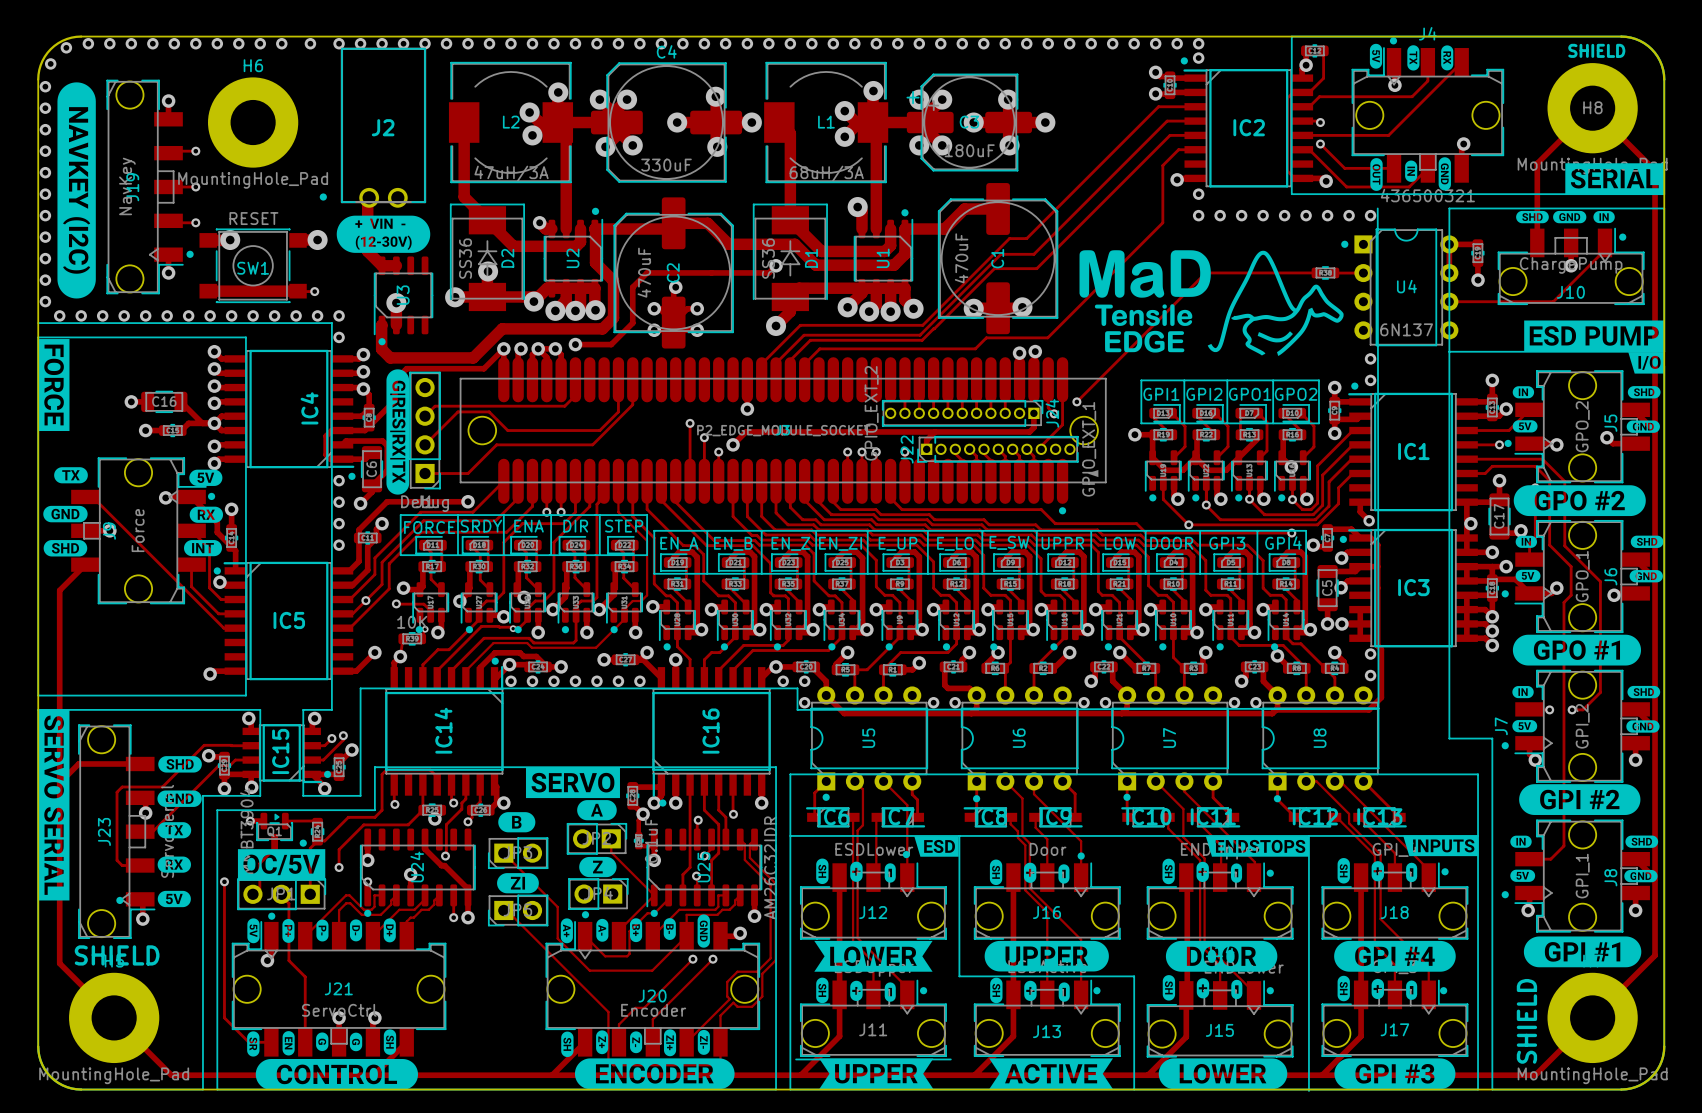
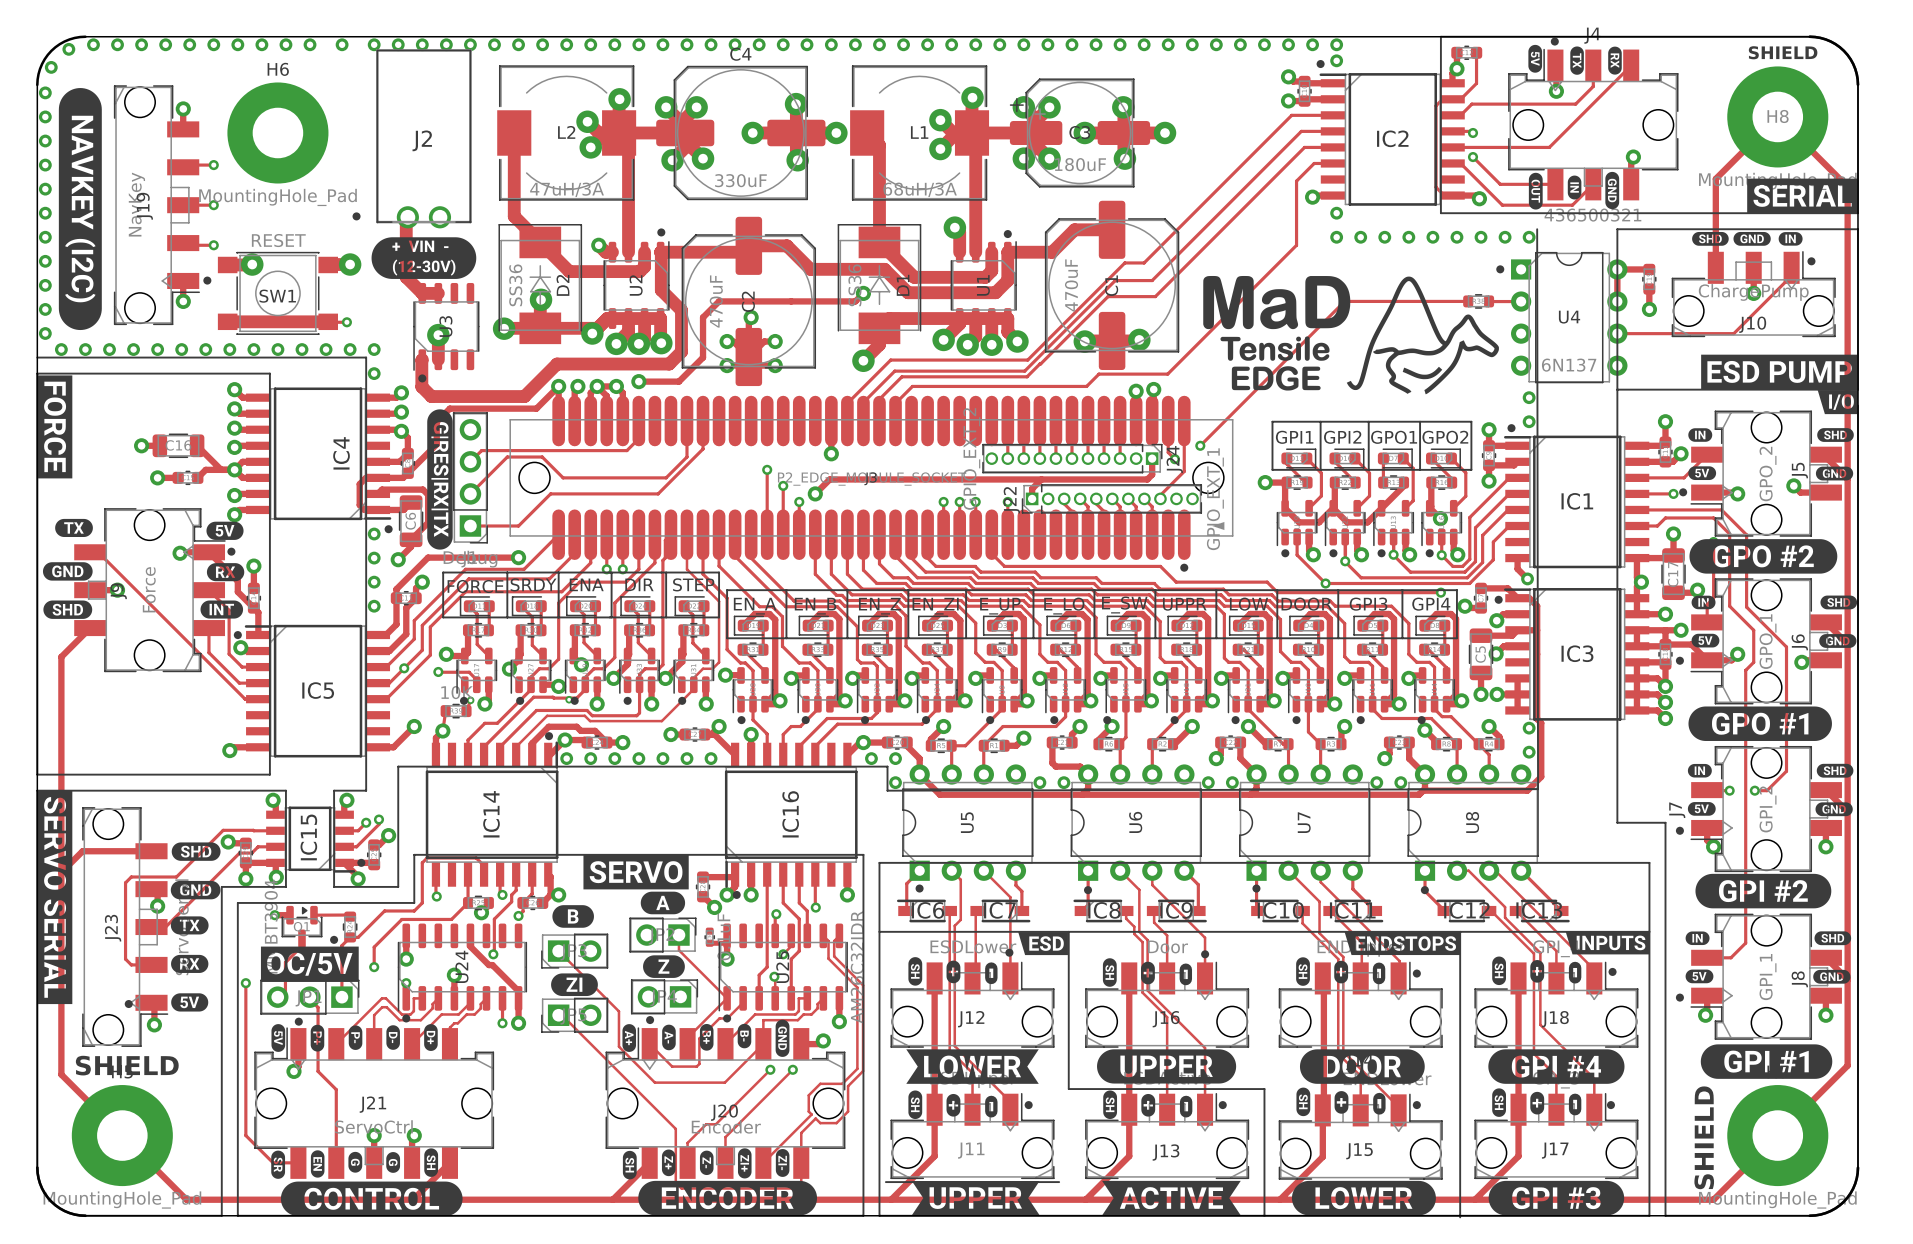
track: (643, 814) (638, 820) (638, 835) -> none

